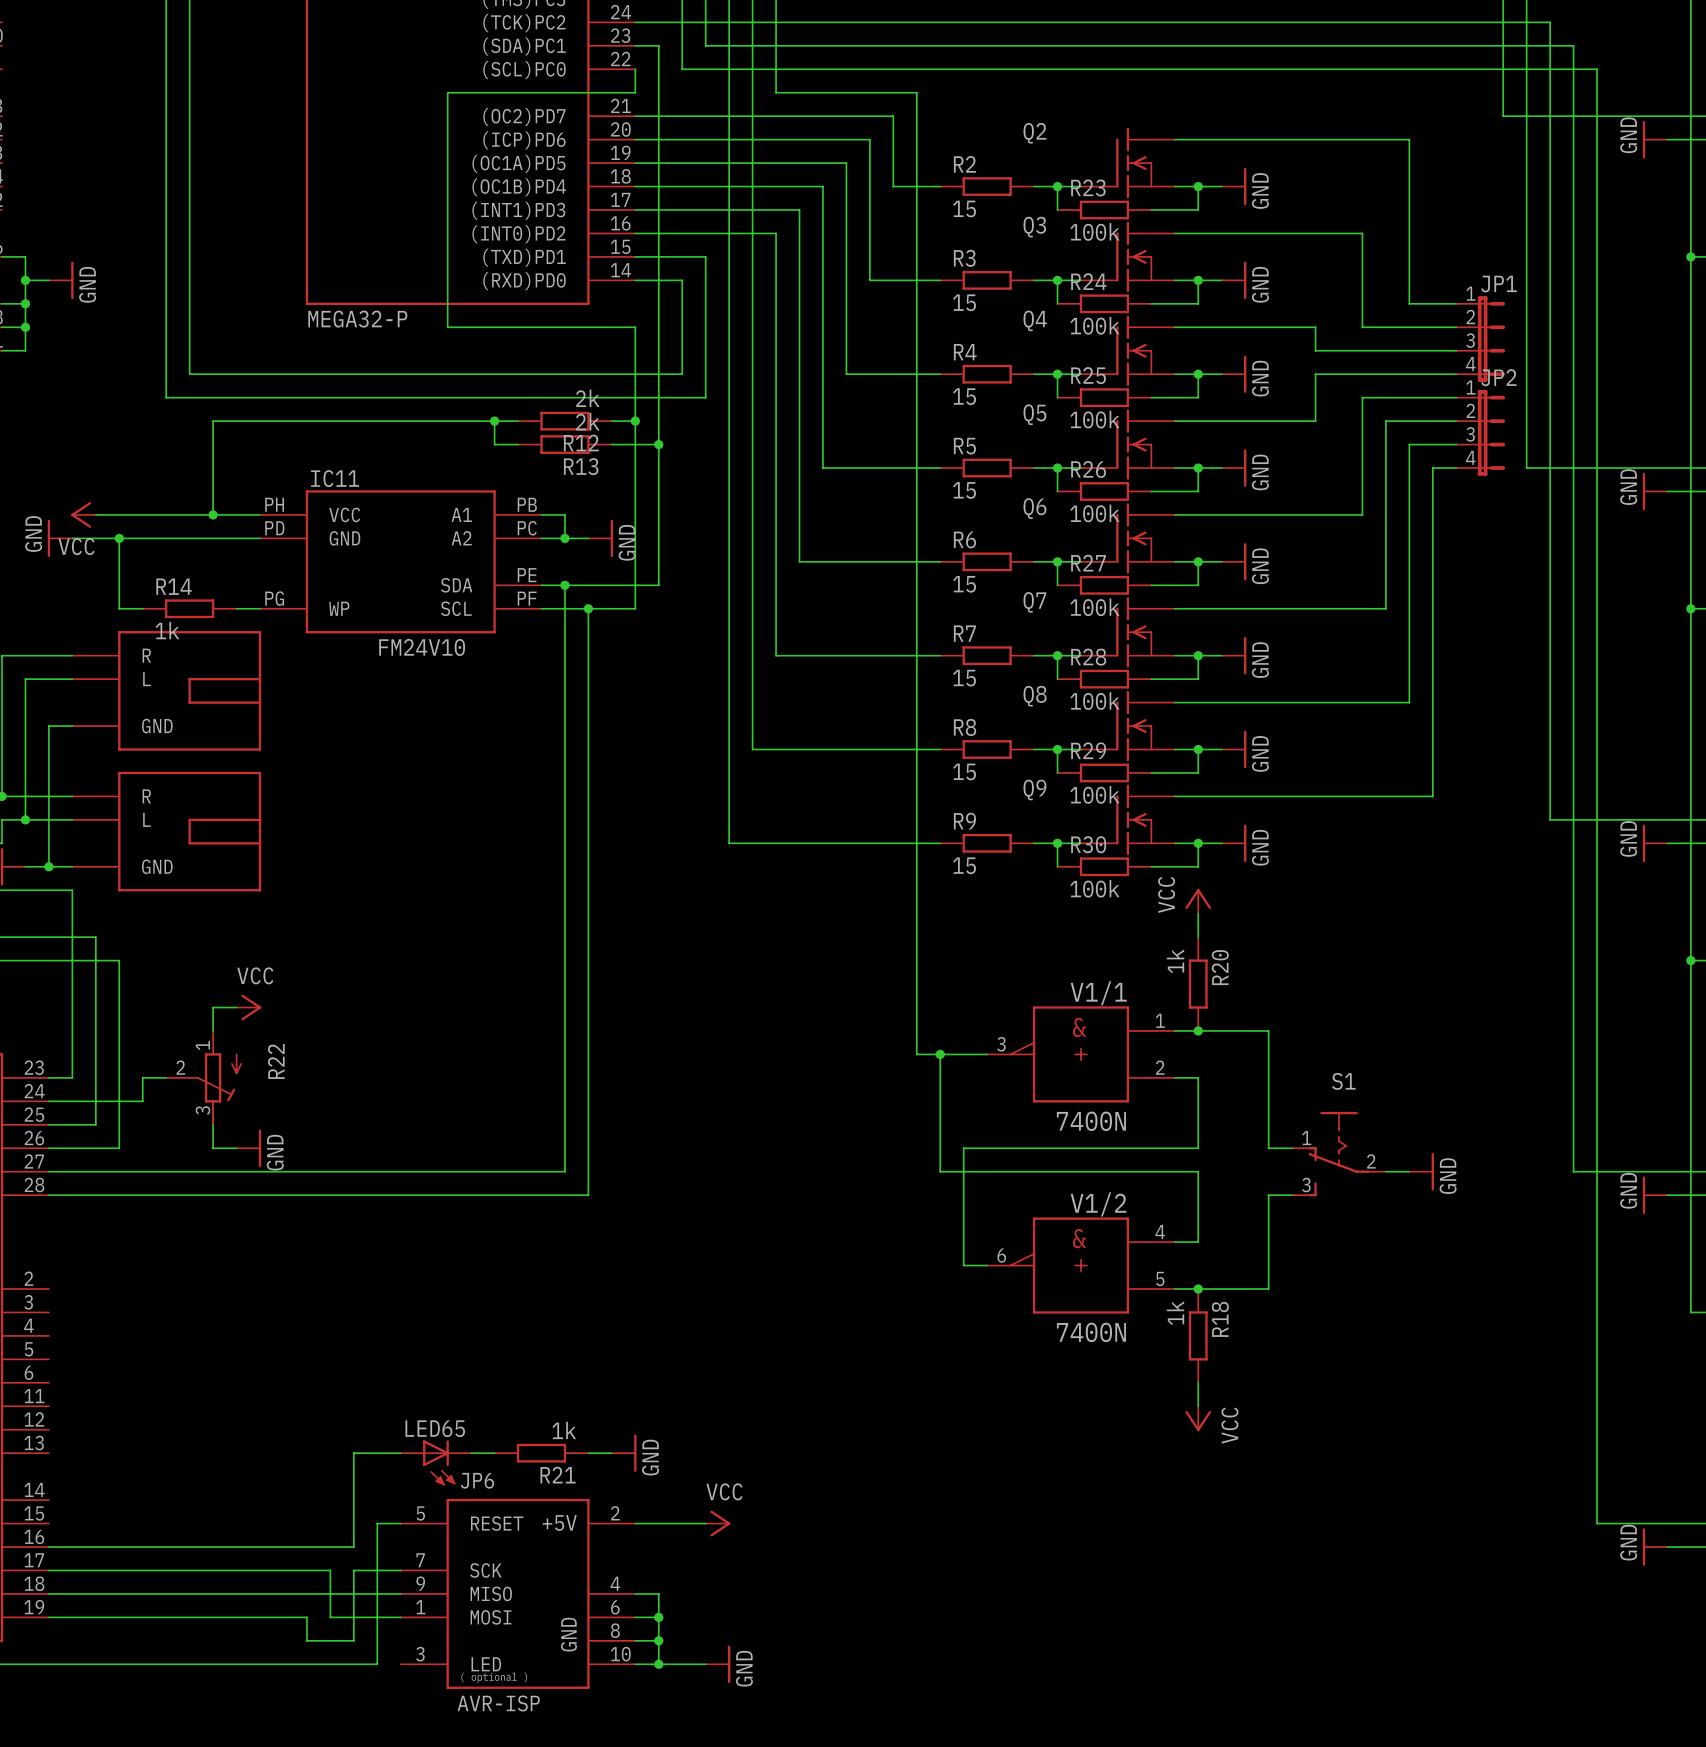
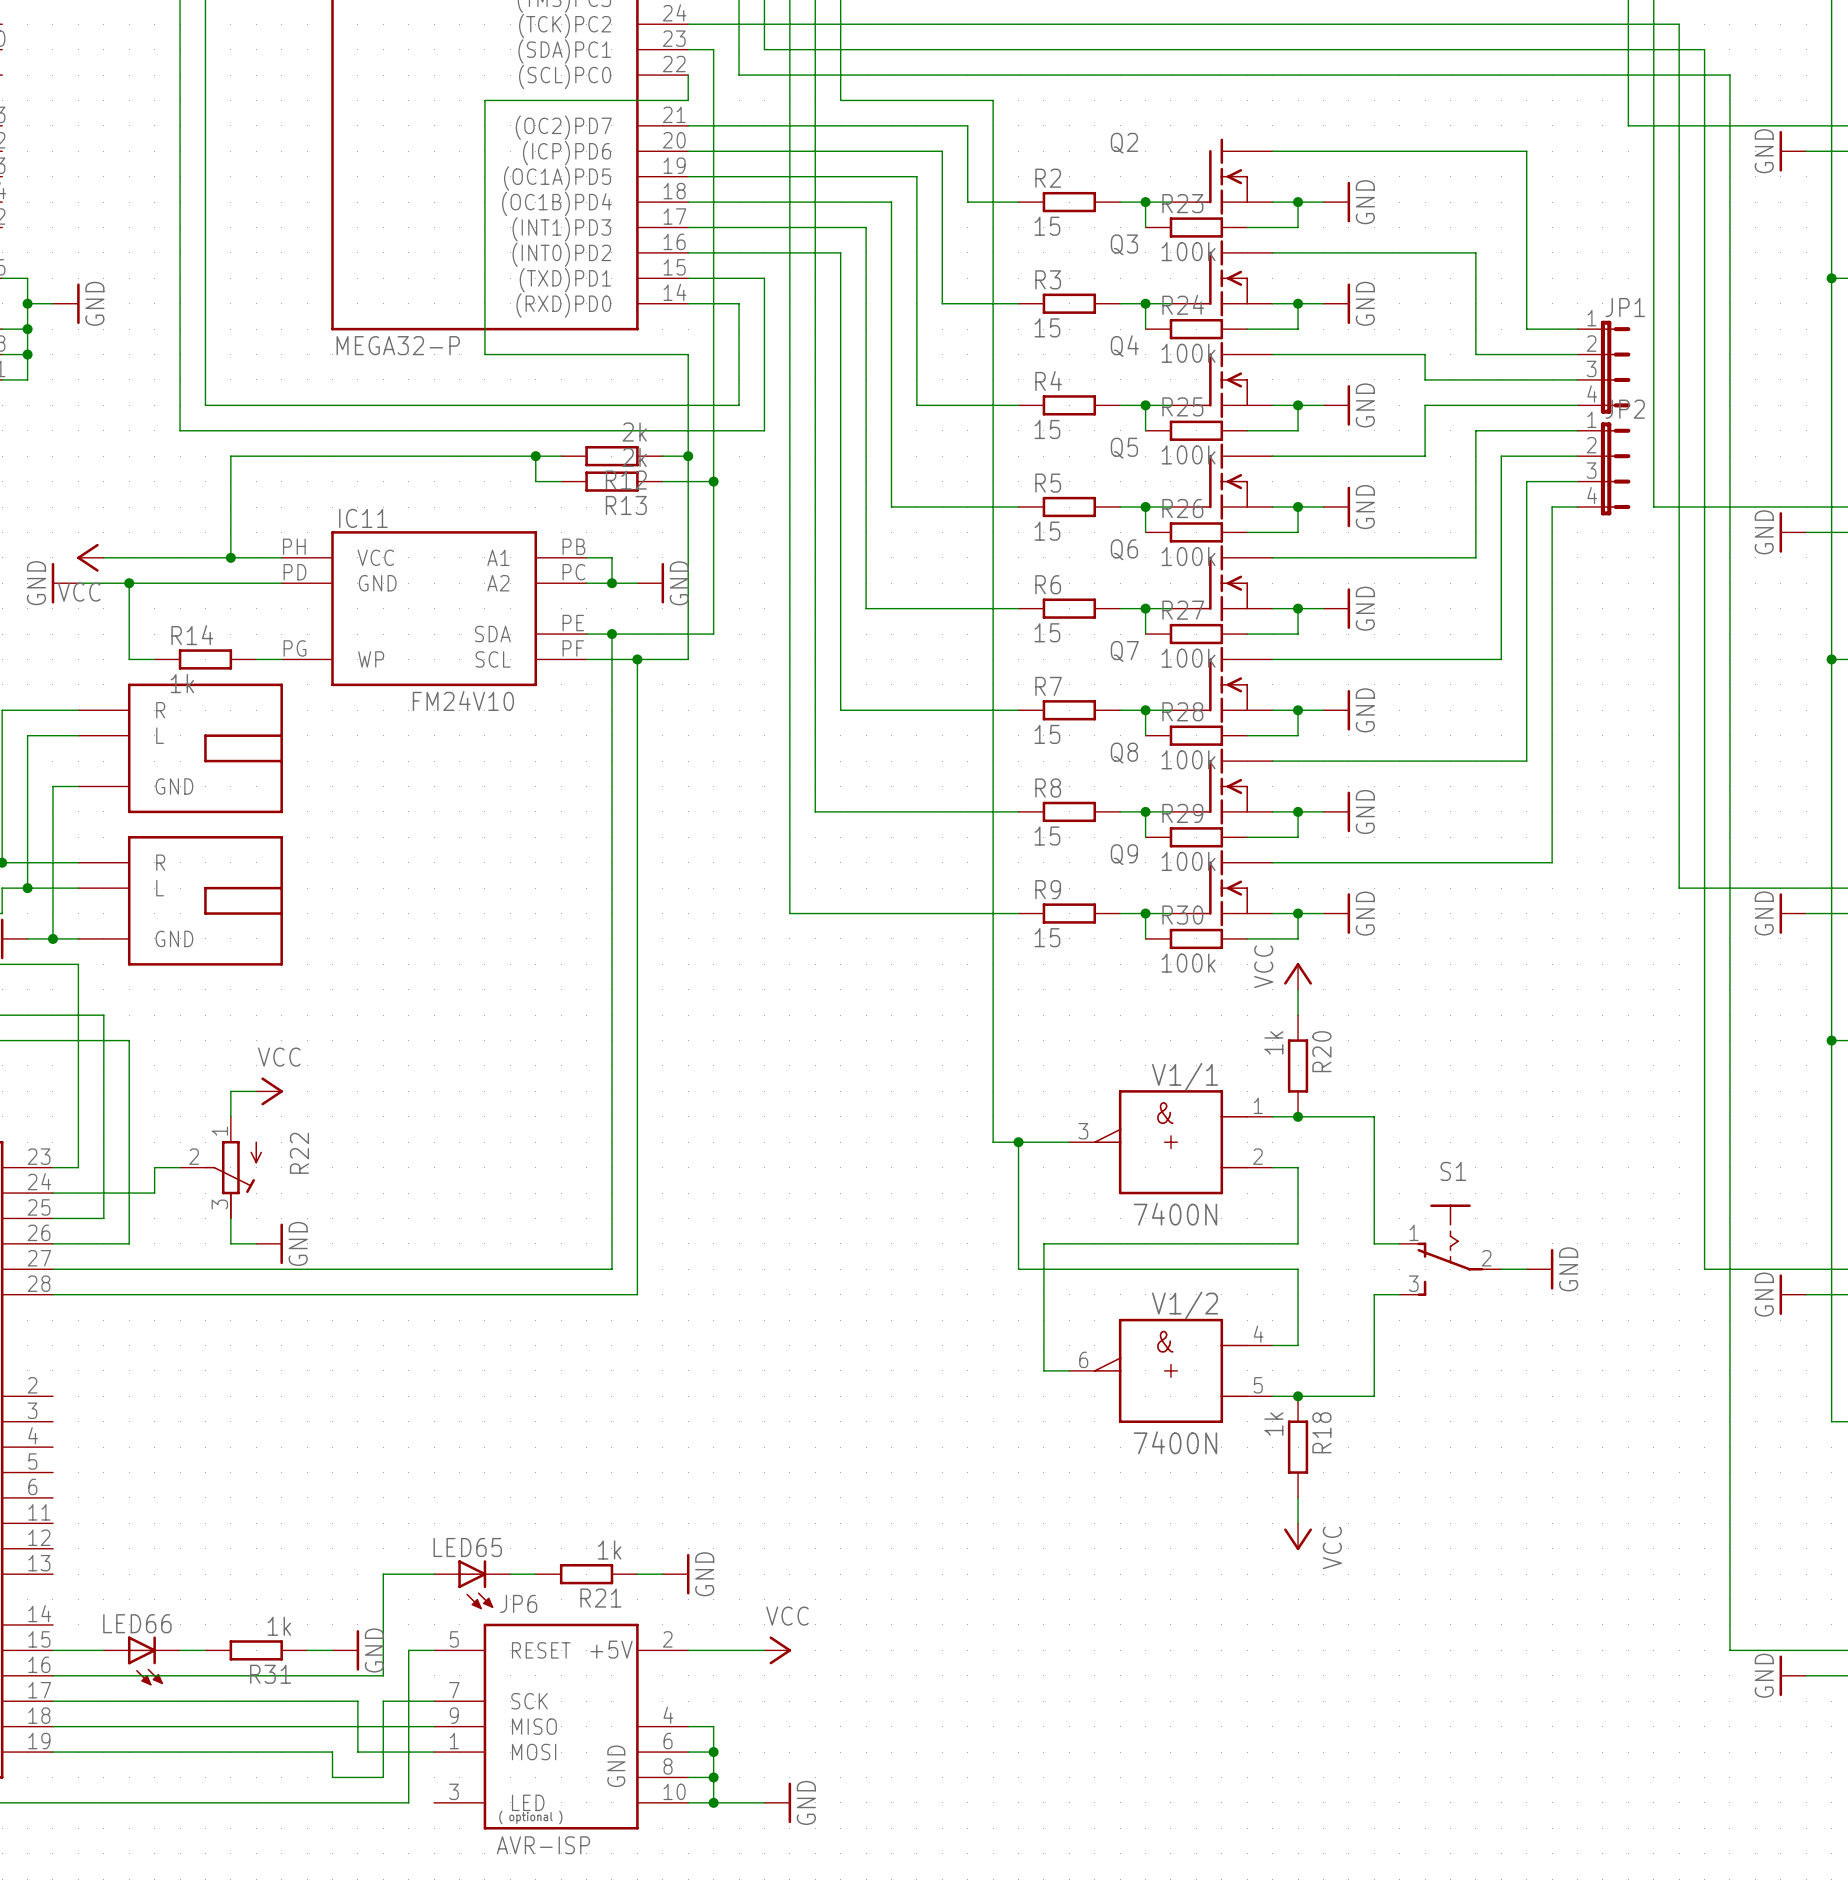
wire: none -> (52, 1650) (103, 1650)
wire: none -> (180, 1650) (205, 1650)
R31: none -> 1k (256, 1650)
wire: none -> (307, 1650) (332, 1650)
power symbol: none -> GND (345, 1650)
LED66: none -> (141, 1660)

